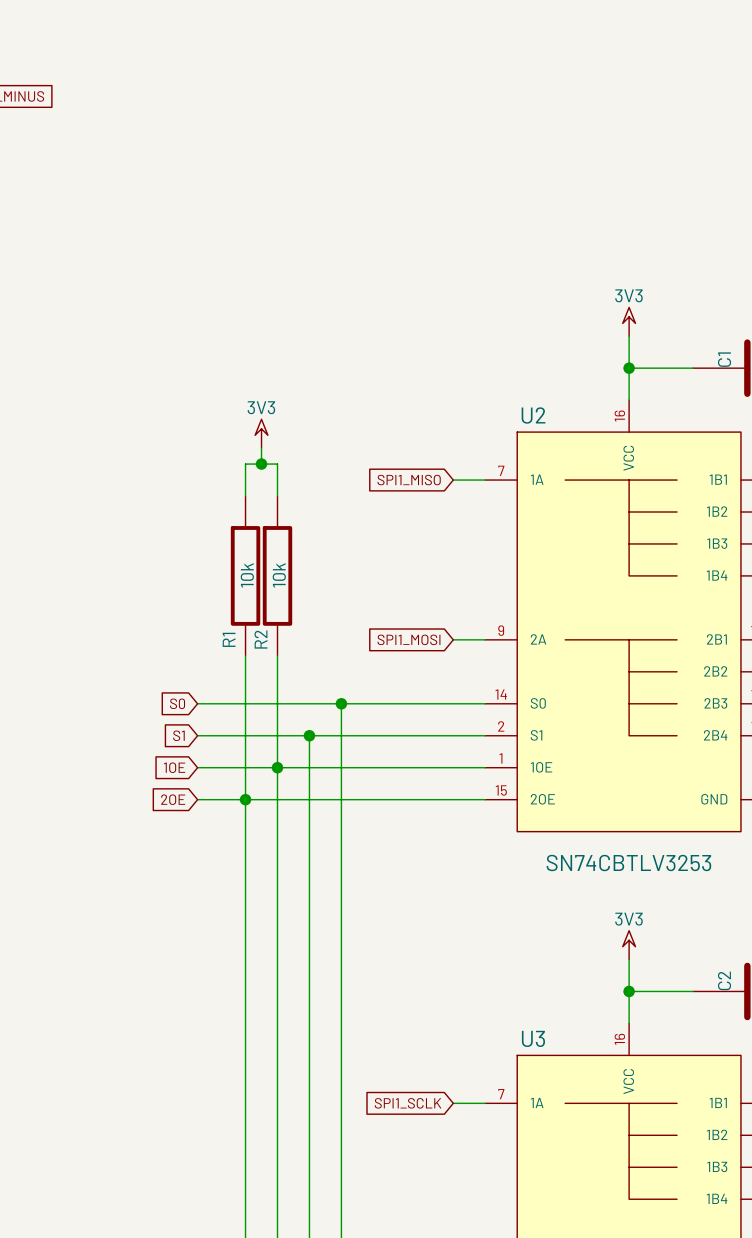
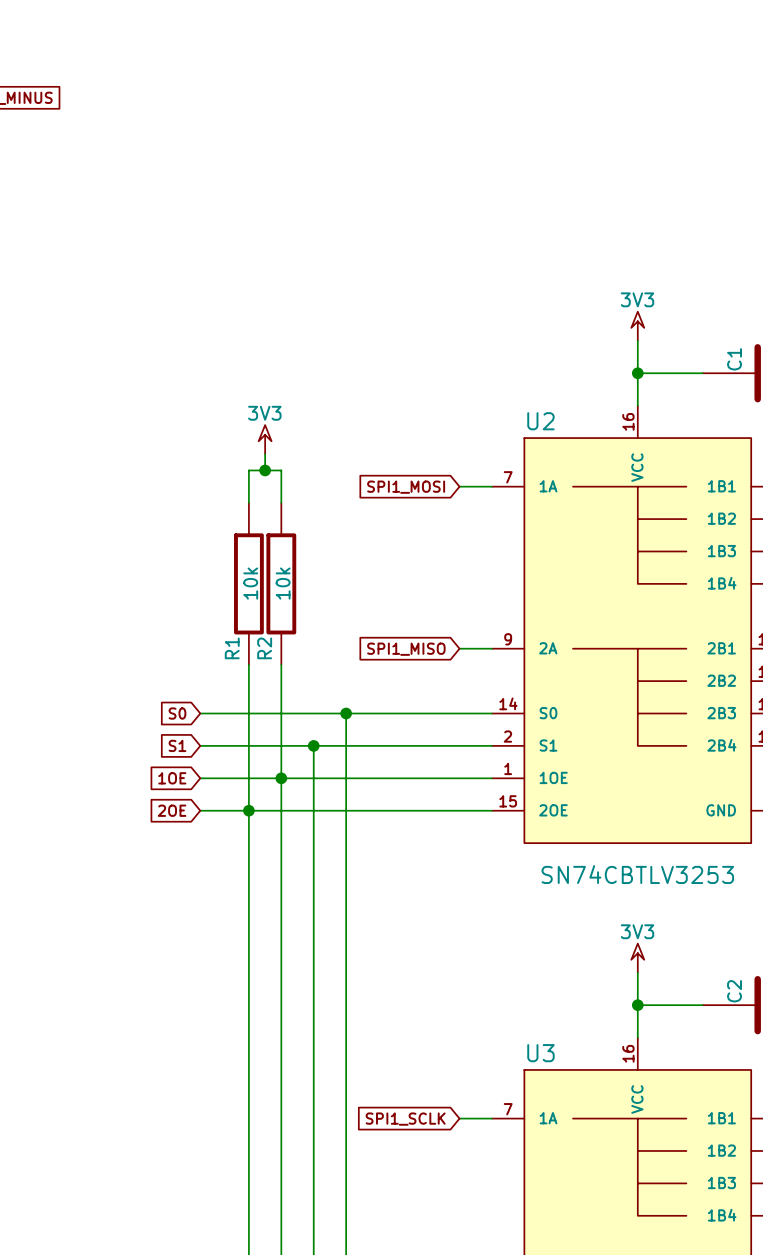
global label: SPI1_MISO (409, 480) -> SPI1_MOSI (406, 487)
global label: SPI1_MOSI (408, 639) -> SPI1_MISO (406, 649)

